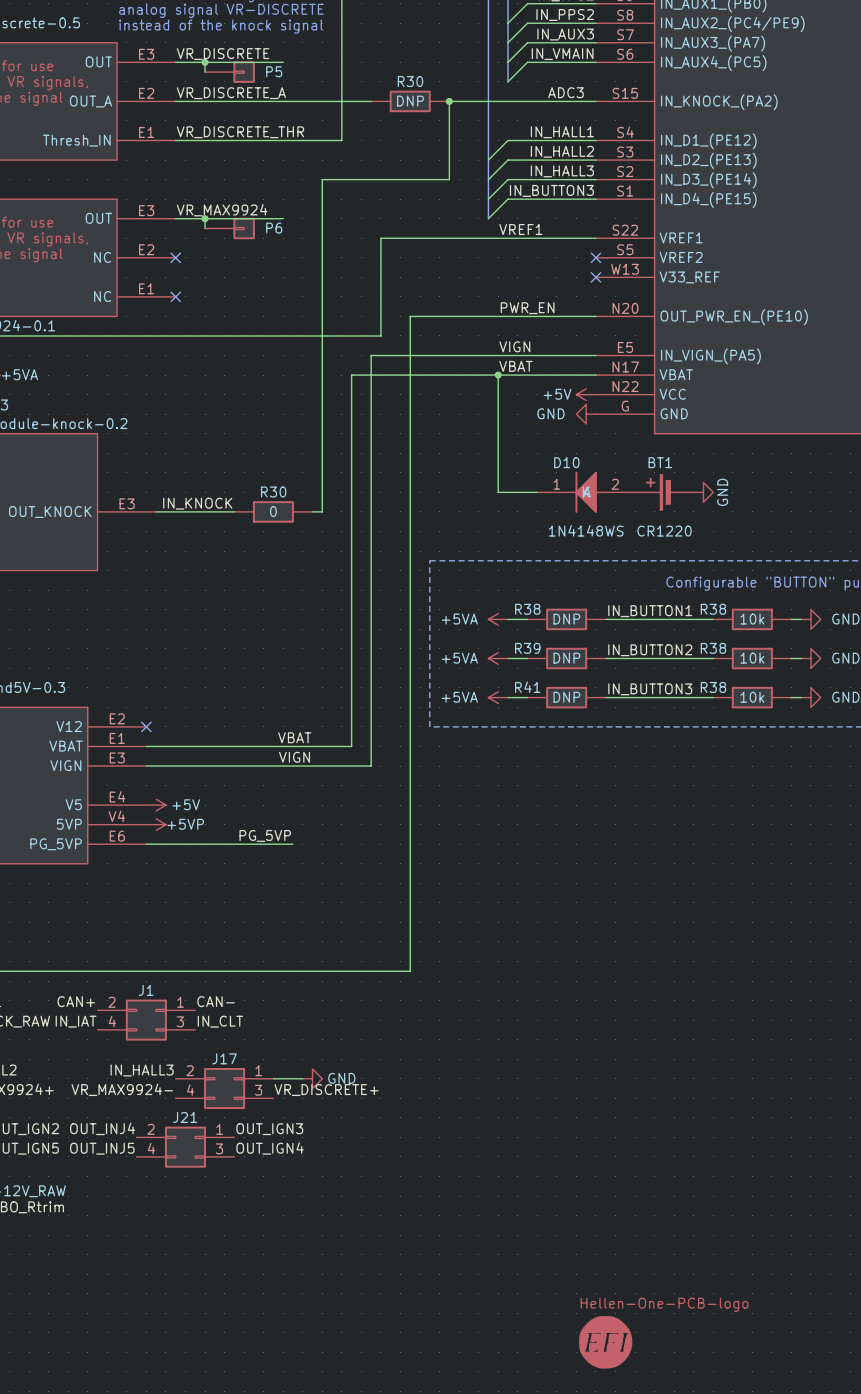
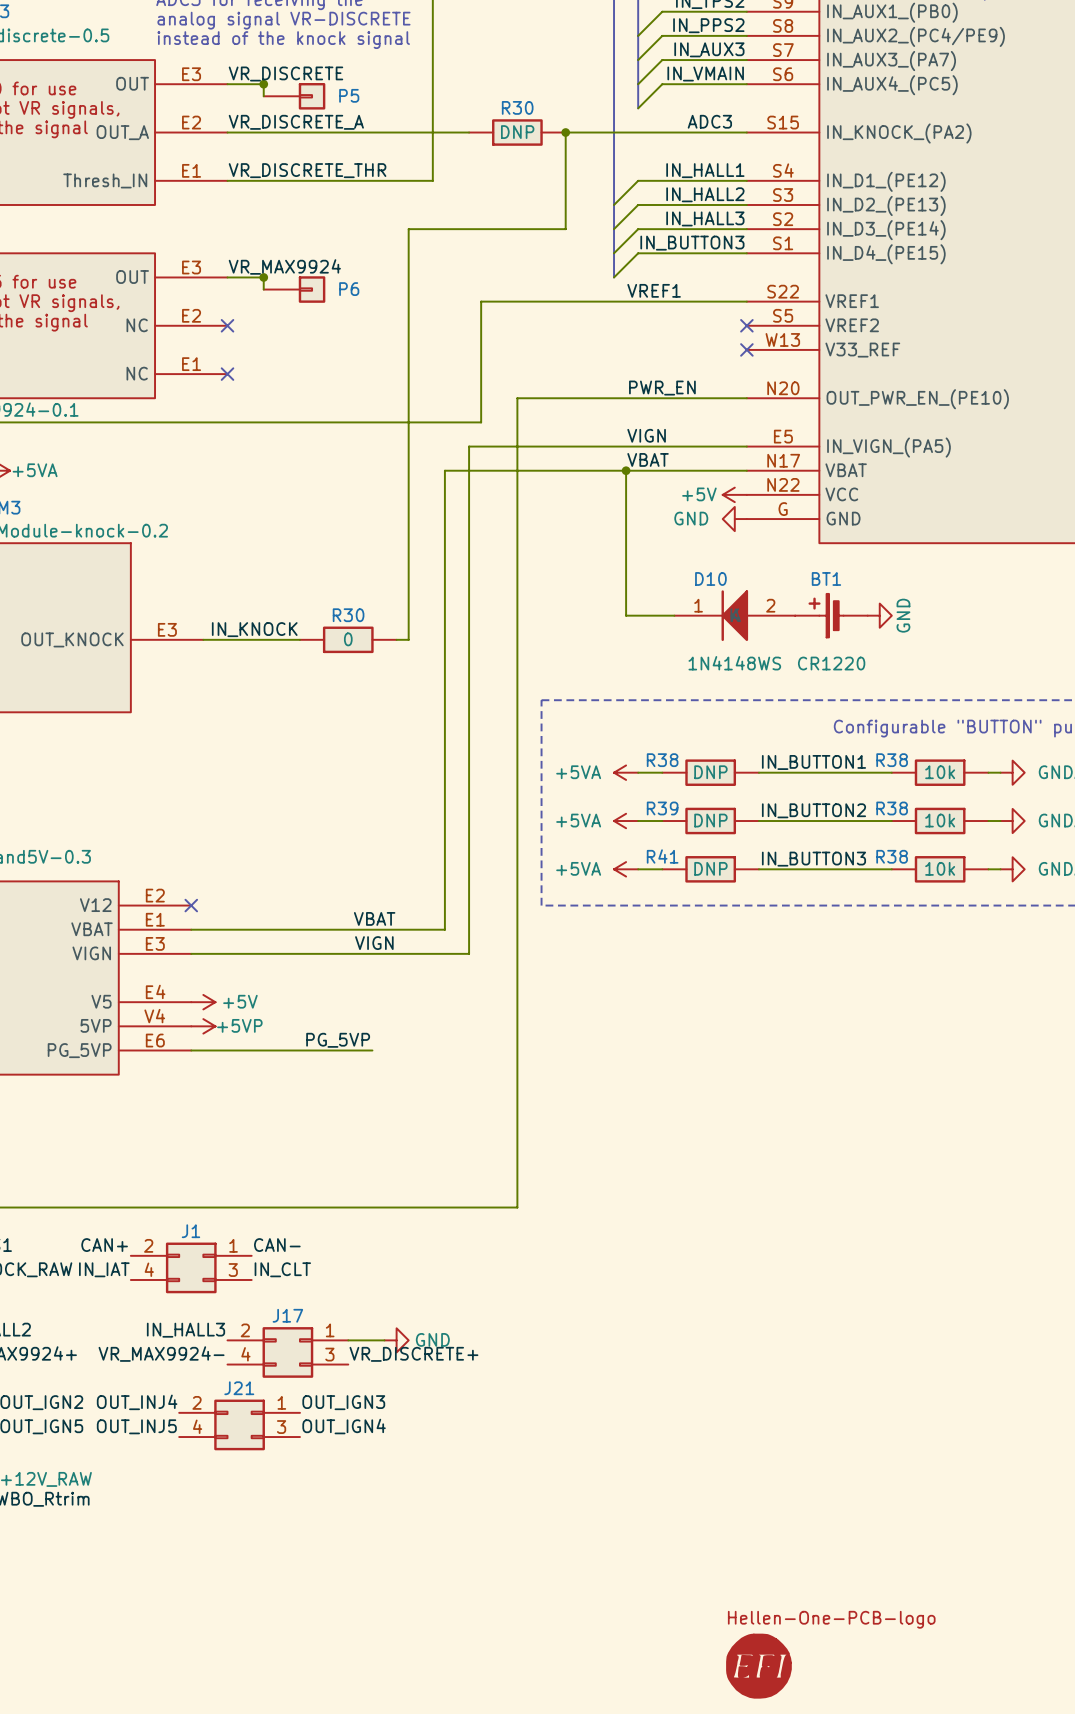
wire: (205, 62) (283, 62) -> none
wire: (205, 218) (283, 218) -> none

